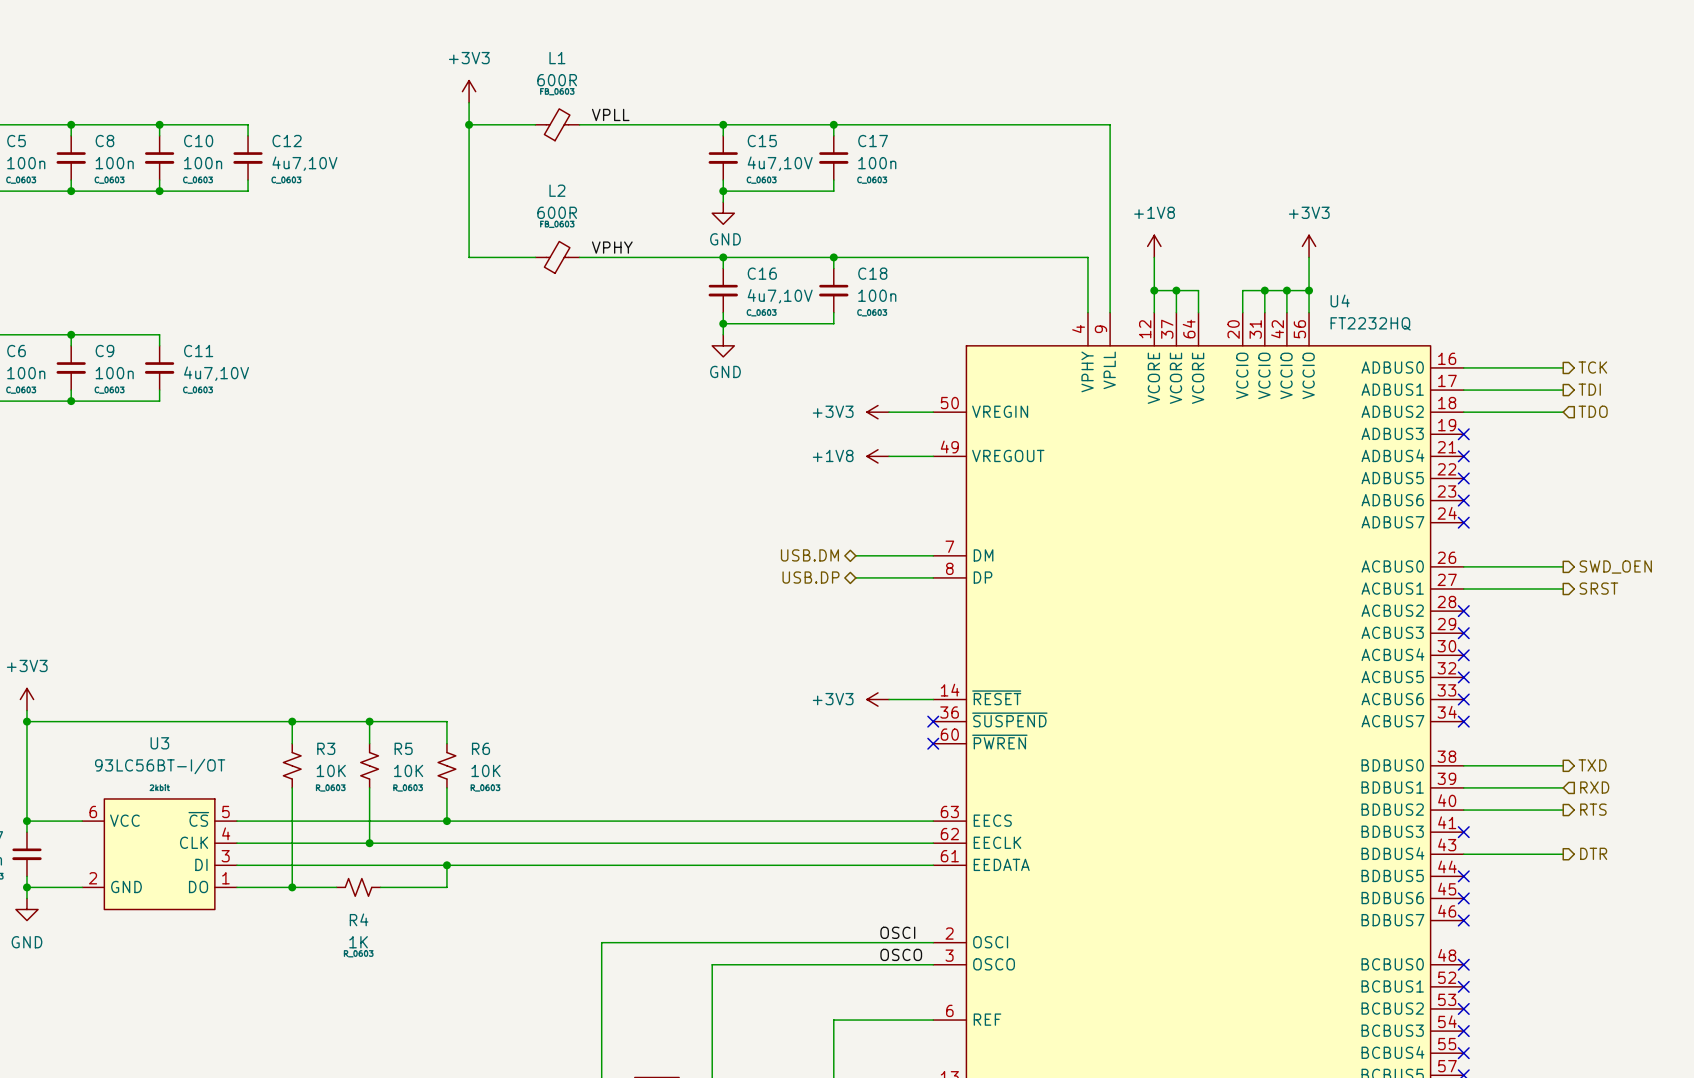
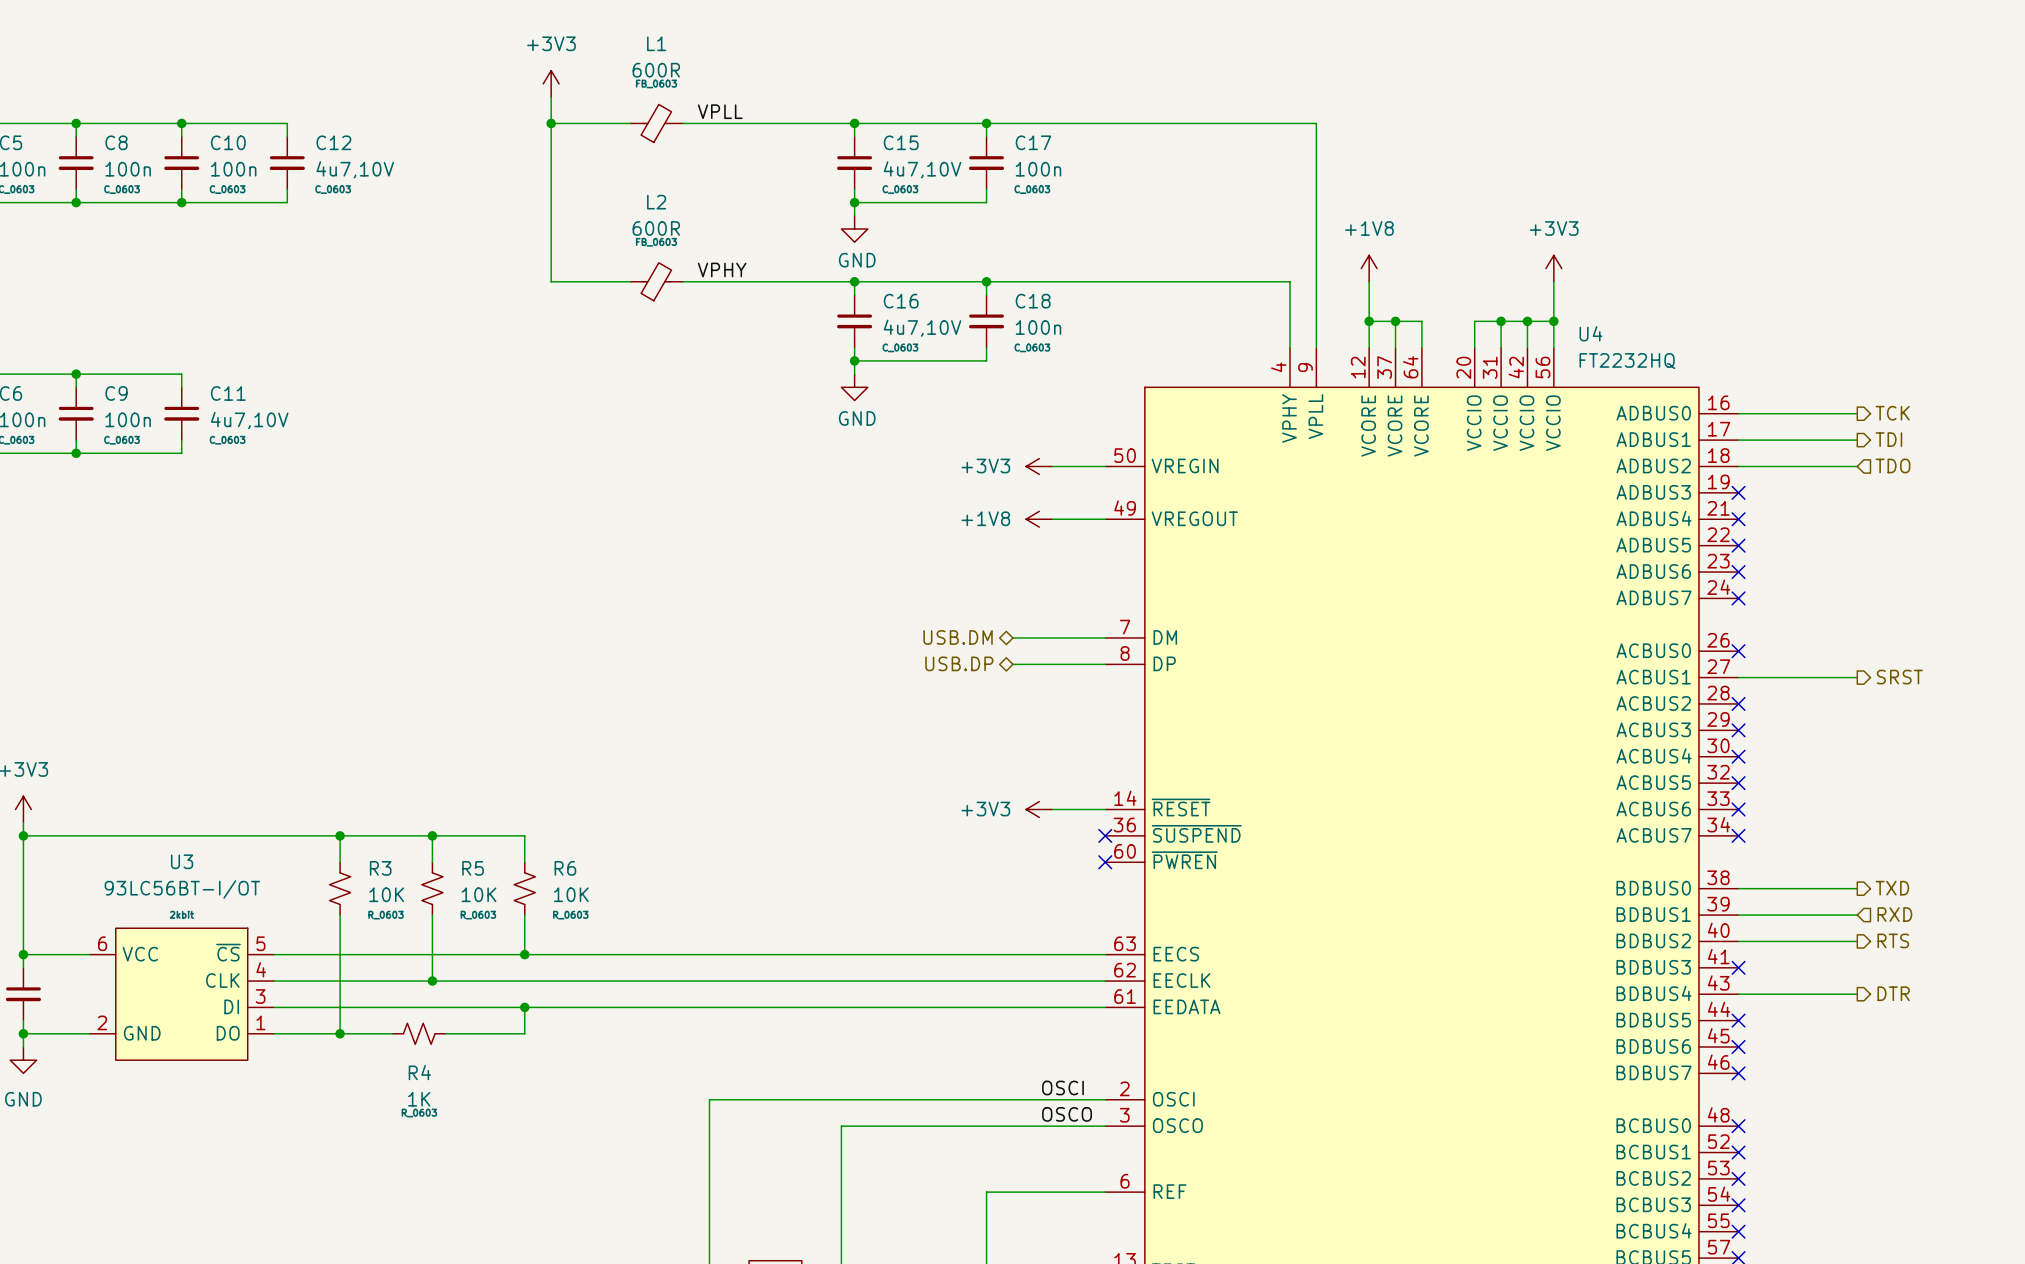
wire: (1463, 566) (1563, 566) -> none
no-connect mark: none -> (1738, 651)
hierarchical label: SWD_OEN (1615, 567) -> none

